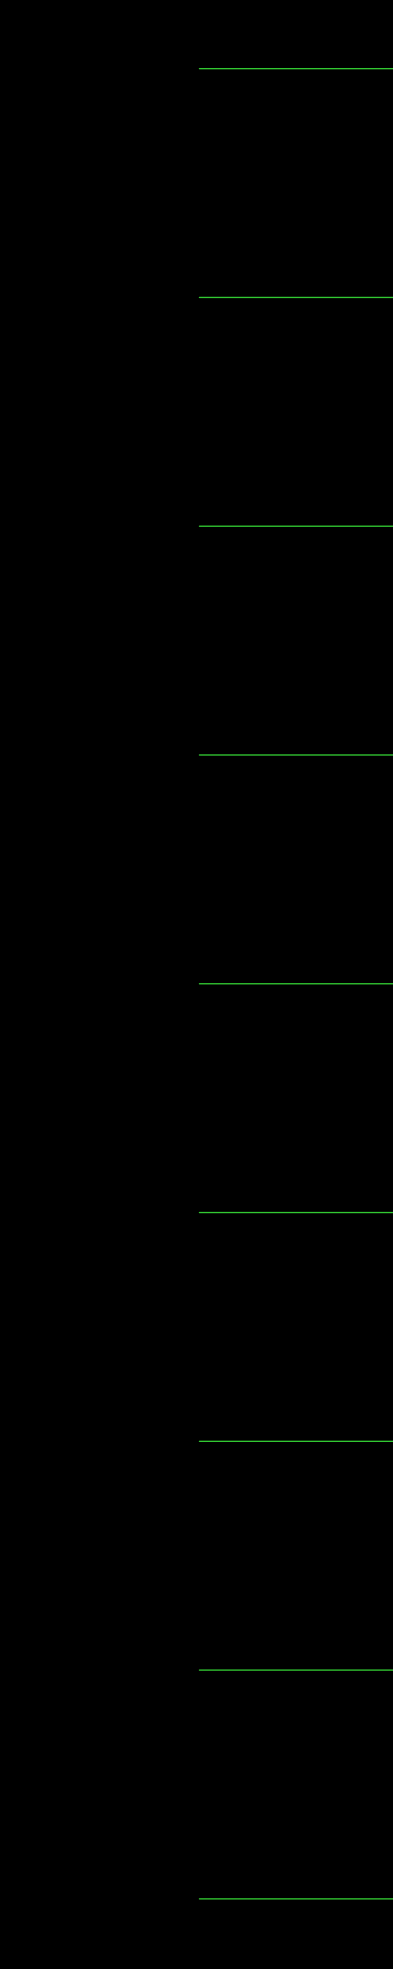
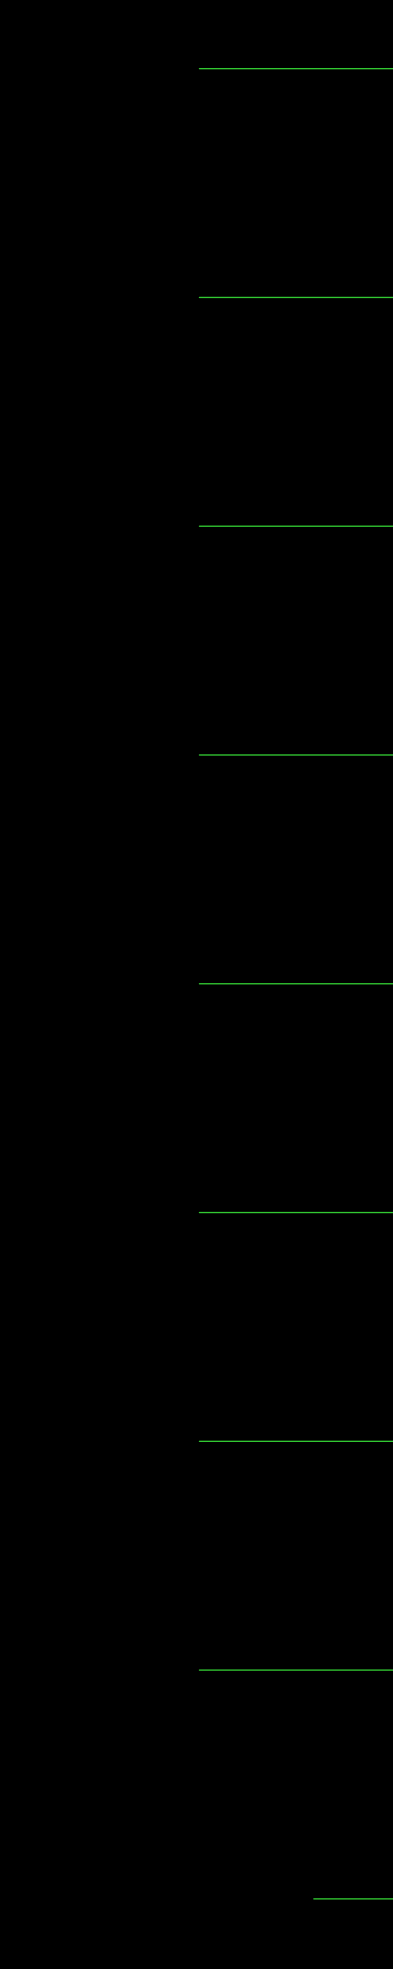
wire: (199, 1898) (313, 1898) -> none

